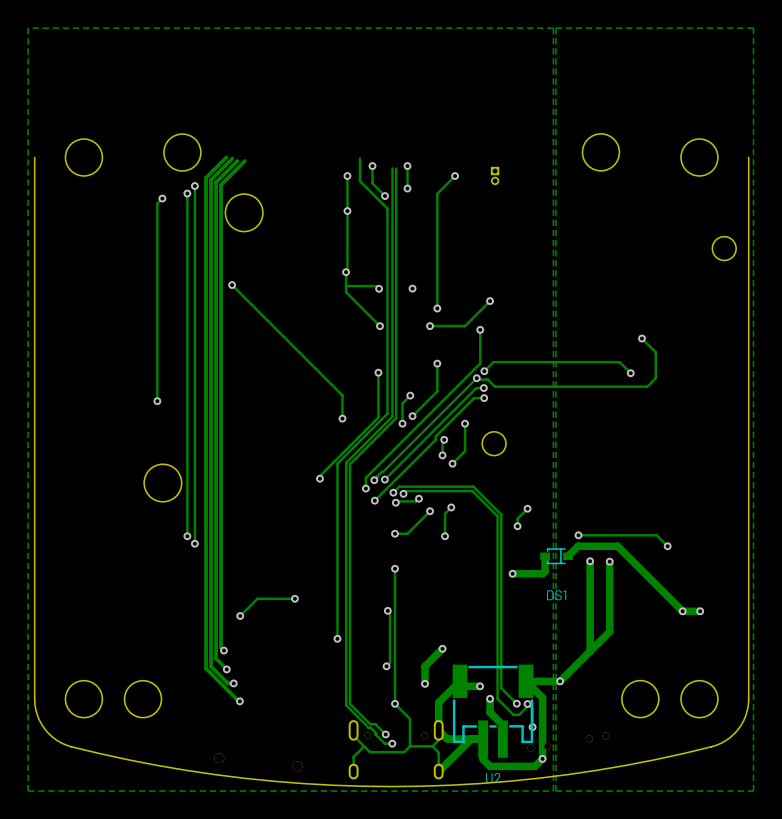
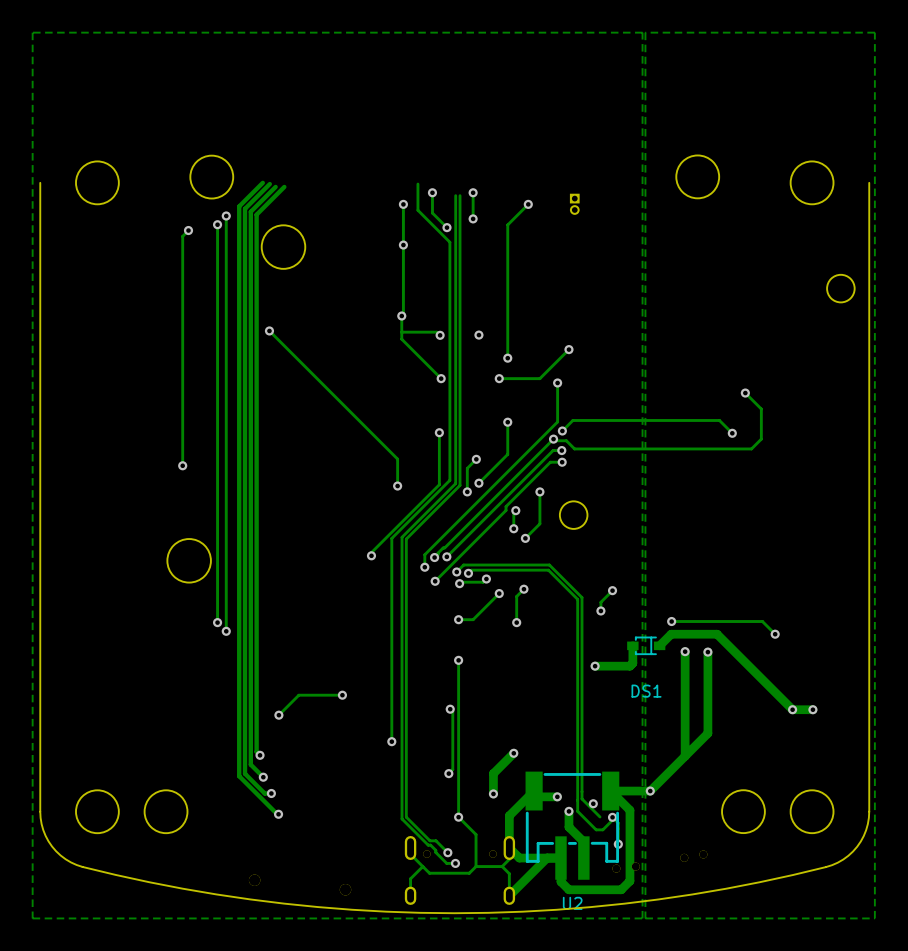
via position: (516, 703) -> (593, 803)
via: (542, 758) -> none

